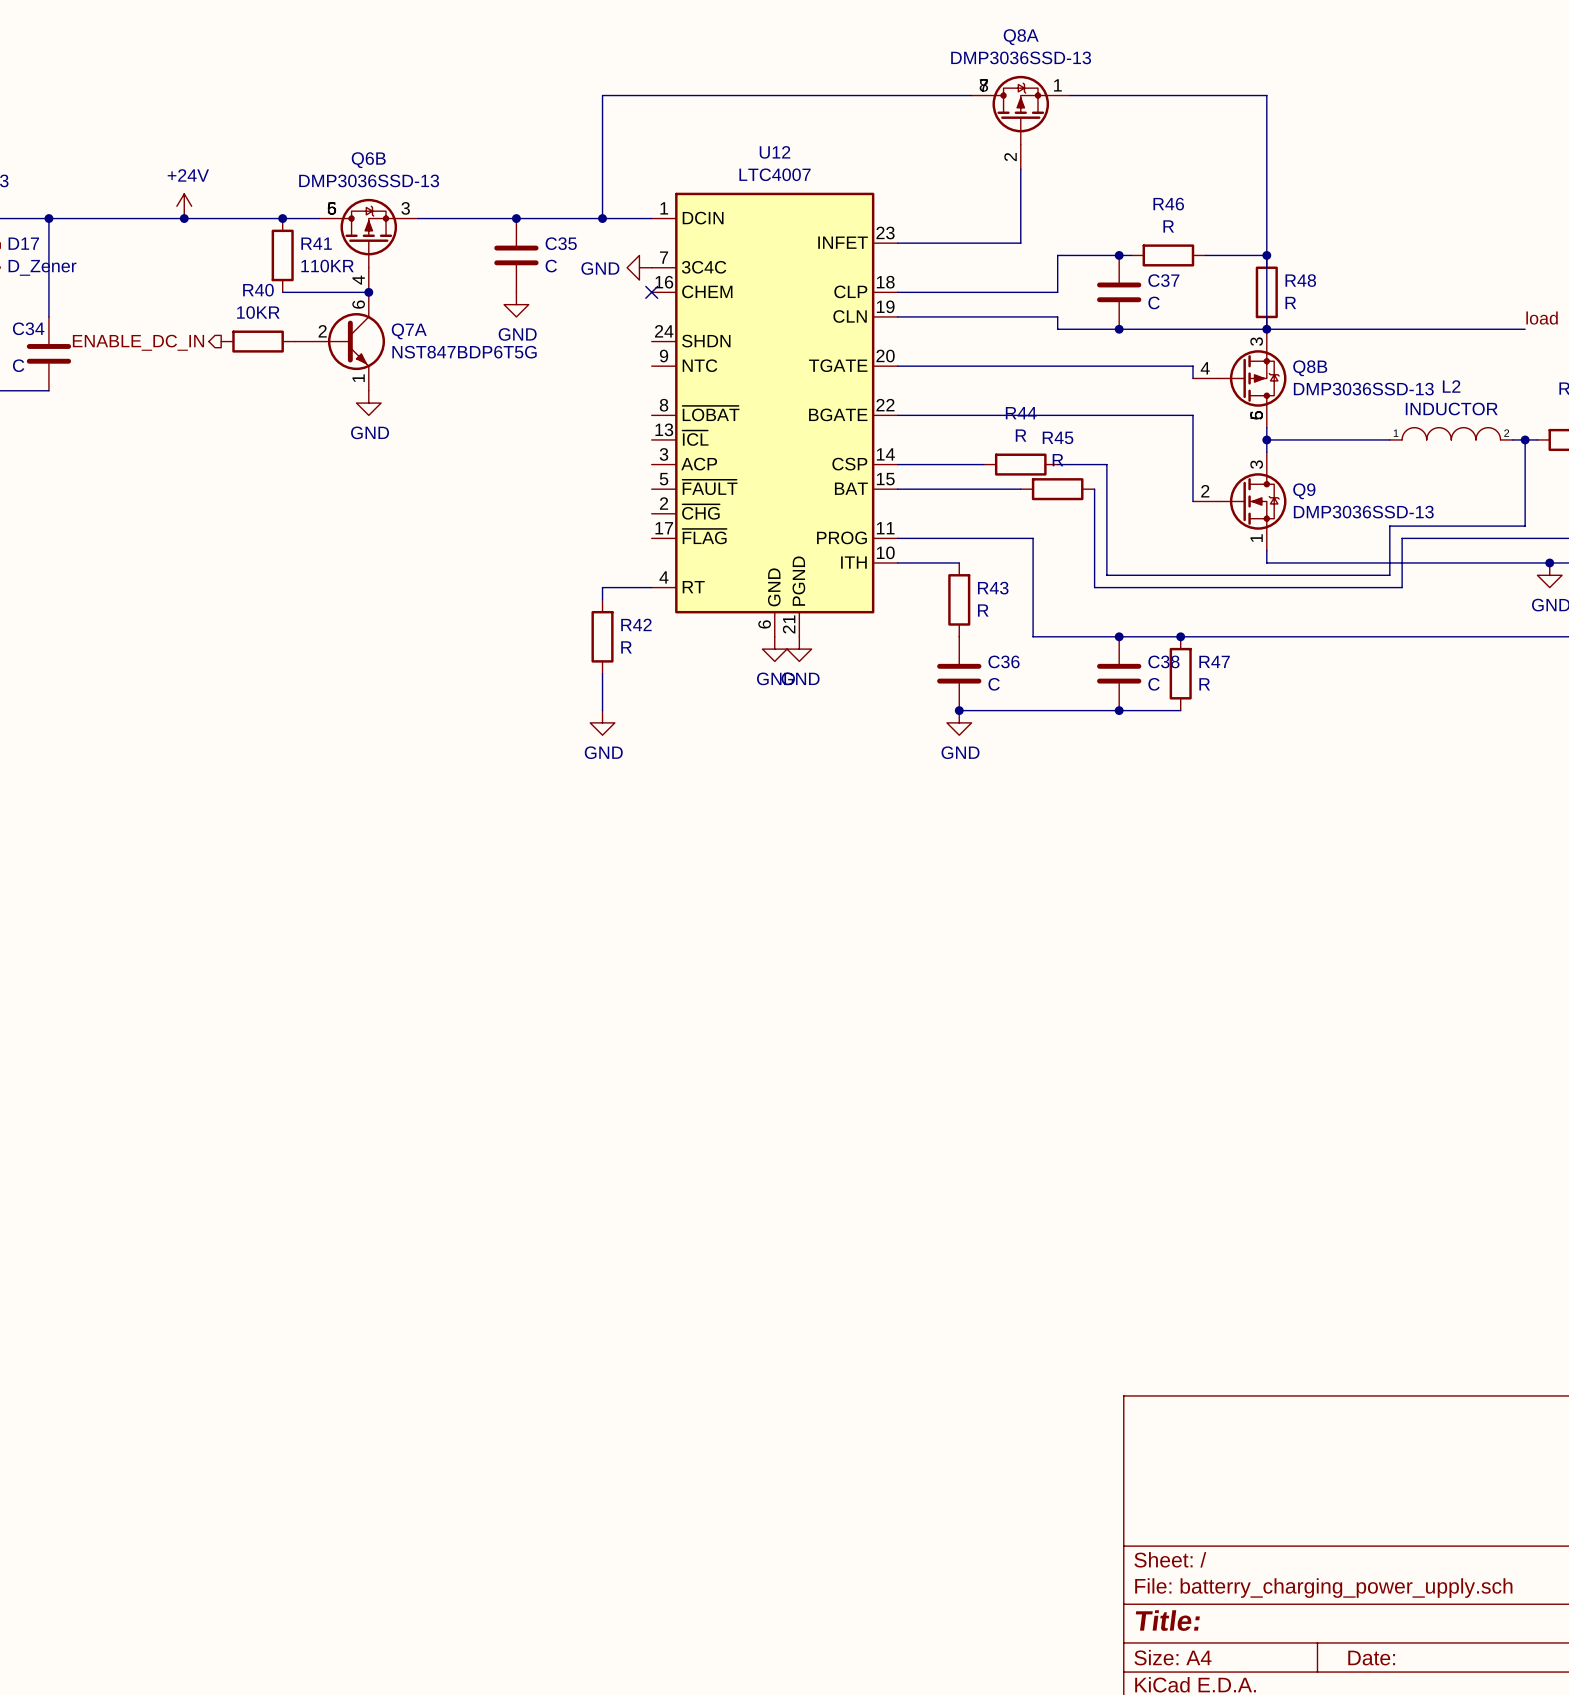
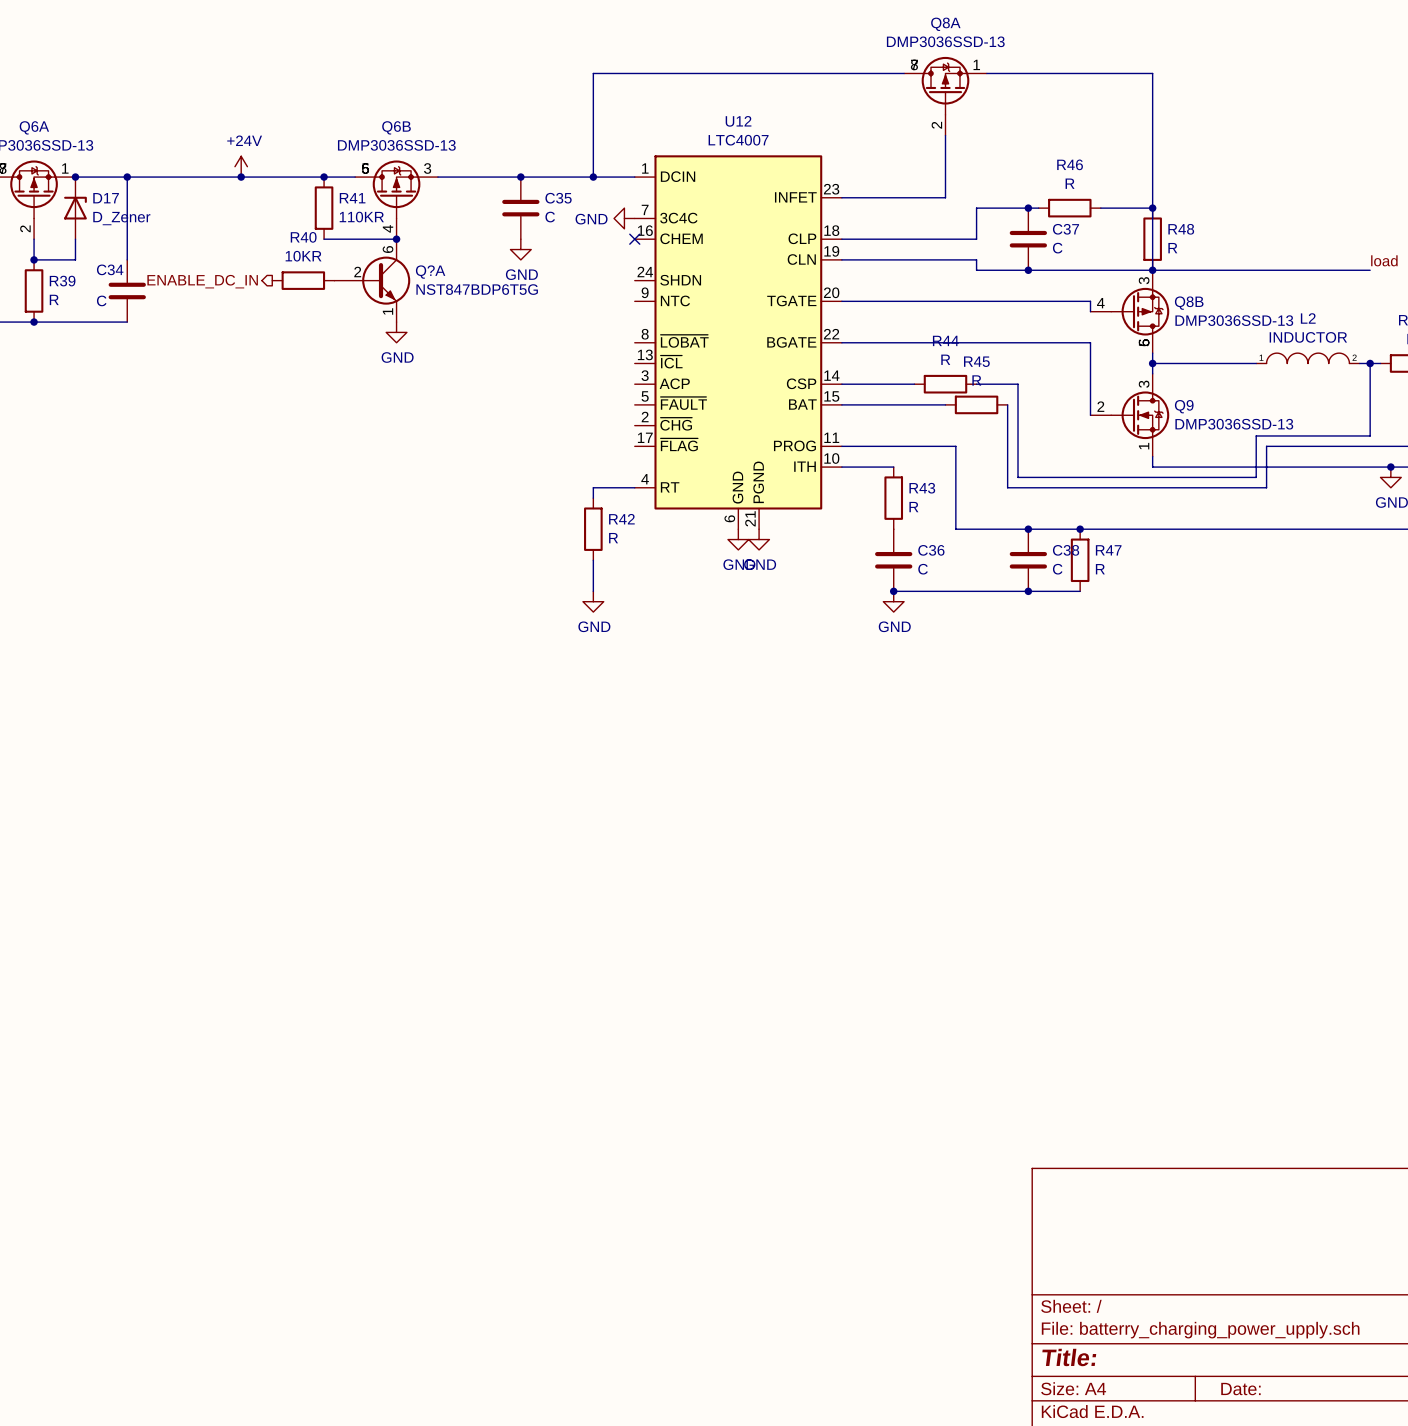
Q7A name: Q7A (409, 331) -> Q?A (430, 272)

